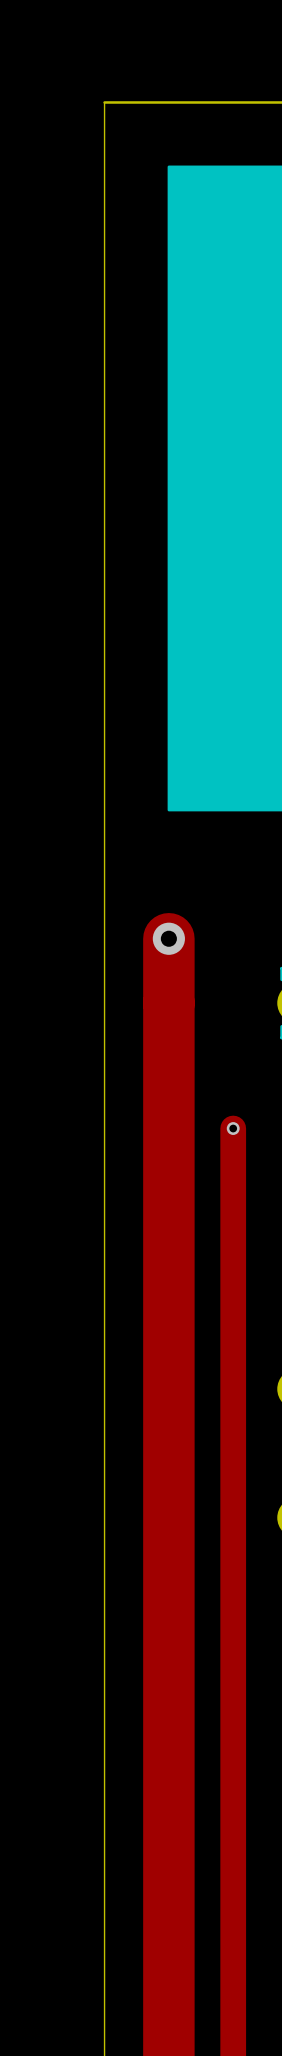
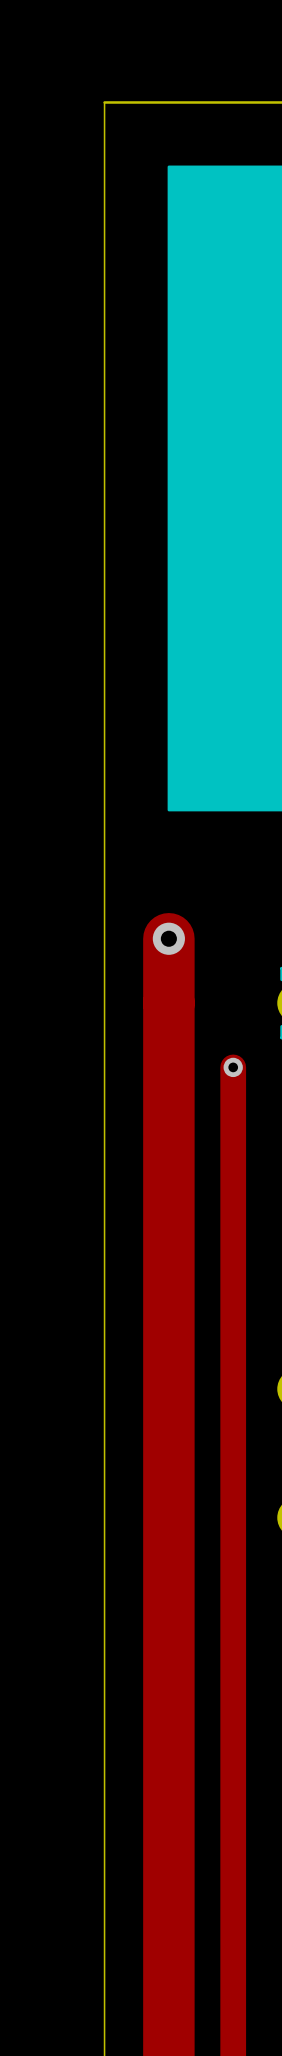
track: none -> (233, 1067) (233, 1128)
via: none -> (233, 1067)
via: (233, 1128) -> none

